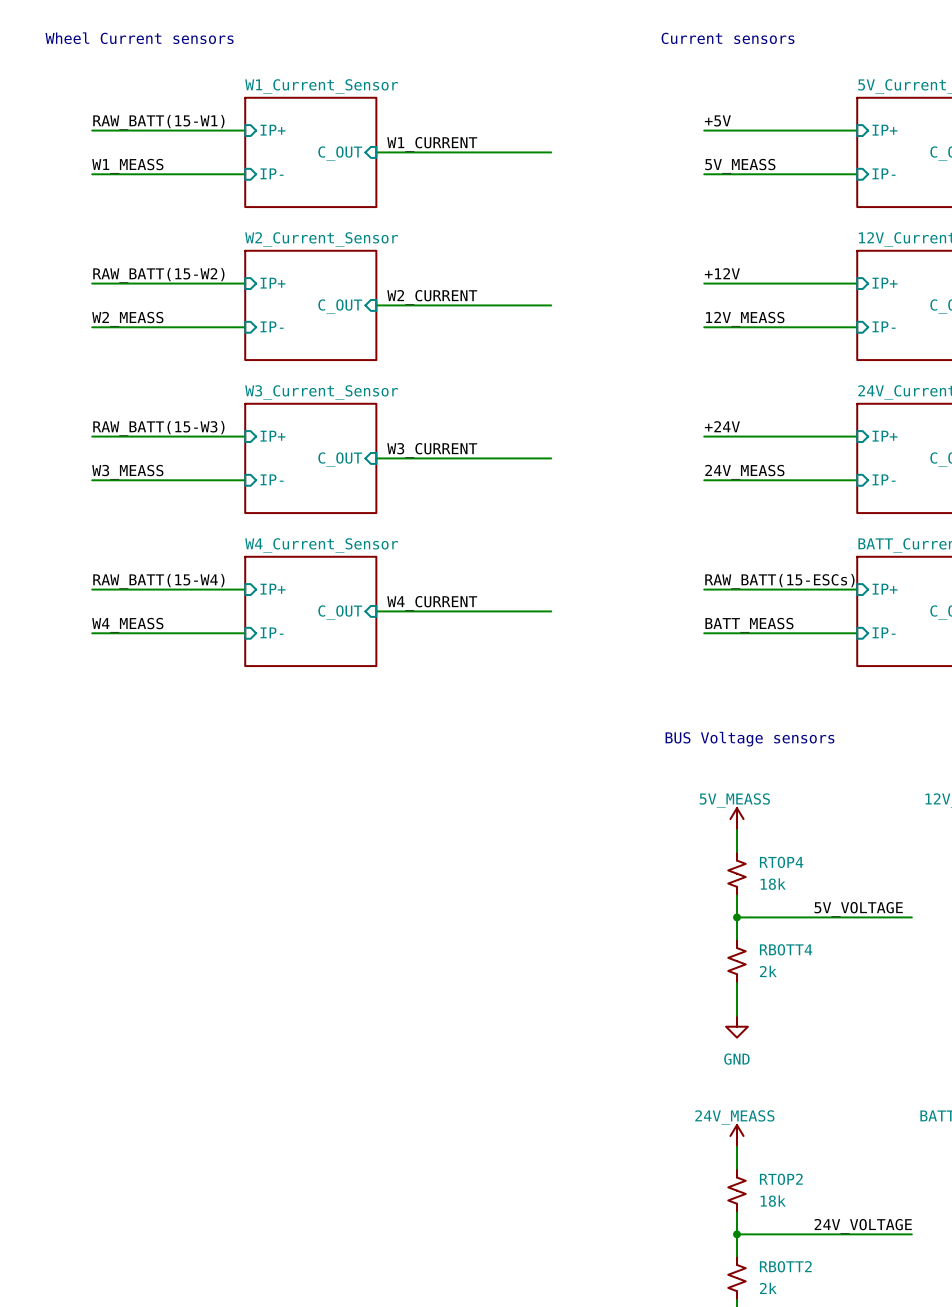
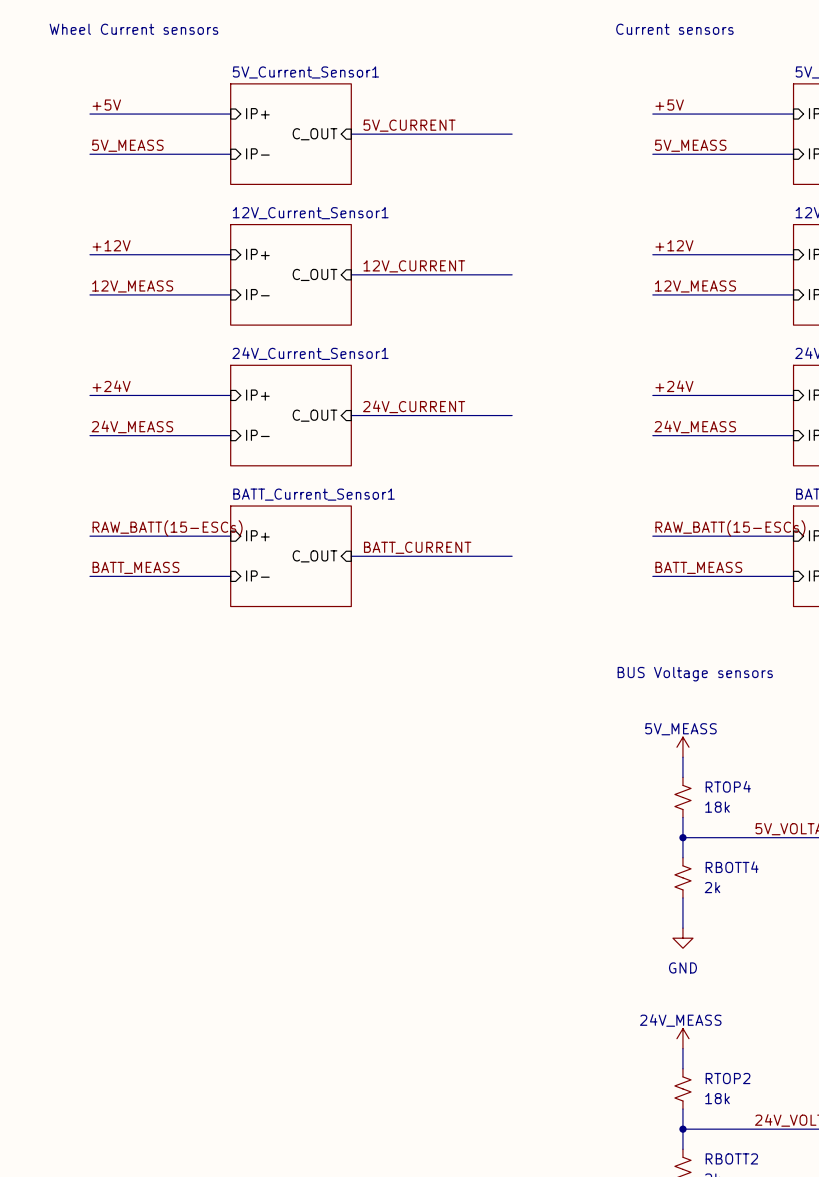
sheet W1_Current_Sensor name: W1_Current_Sensor (321, 86) -> 5V_Current_Sensor1 (305, 72)
label: RAW_BATT(15-W1) (158, 122) -> +5V (106, 105)
label: W1_CURRENT (432, 144) -> 5V_CURRENT (409, 125)
label: W1_MEASS (127, 166) -> 5V_MEASS (127, 145)
sheet W2_Current_Sensor name: W2_Current_Sensor (321, 239) -> 12V_Current_Sensor1 (310, 213)
label: RAW_BATT(15-W2) (158, 275) -> +12V (111, 245)
label: W2_CURRENT (432, 297) -> 12V_CURRENT (414, 266)
label: W2_MEASS (127, 319) -> 12V_MEASS (132, 286)
sheet W3_Current_Sensor name: W3_Current_Sensor (321, 392) -> 24V_Current_Sensor1 (310, 353)
label: RAW_BATT(15-W3) (158, 428) -> +24V (111, 386)
label: W3_CURRENT (432, 450) -> 24V_CURRENT (414, 406)
label: W3_MEASS (127, 472) -> 24V_MEASS (132, 426)
sheet W4_Current_Sensor name: W4_Current_Sensor (321, 545) -> BATT_Current_Sensor1 (314, 494)
label: RAW_BATT(15-W4) (158, 581) -> RAW_BATT(15-ESCs) (167, 528)
label: W4_CURRENT (432, 603) -> BATT_CURRENT (417, 547)
label: W4_MEASS (127, 625) -> BATT_MEASS (136, 567)

